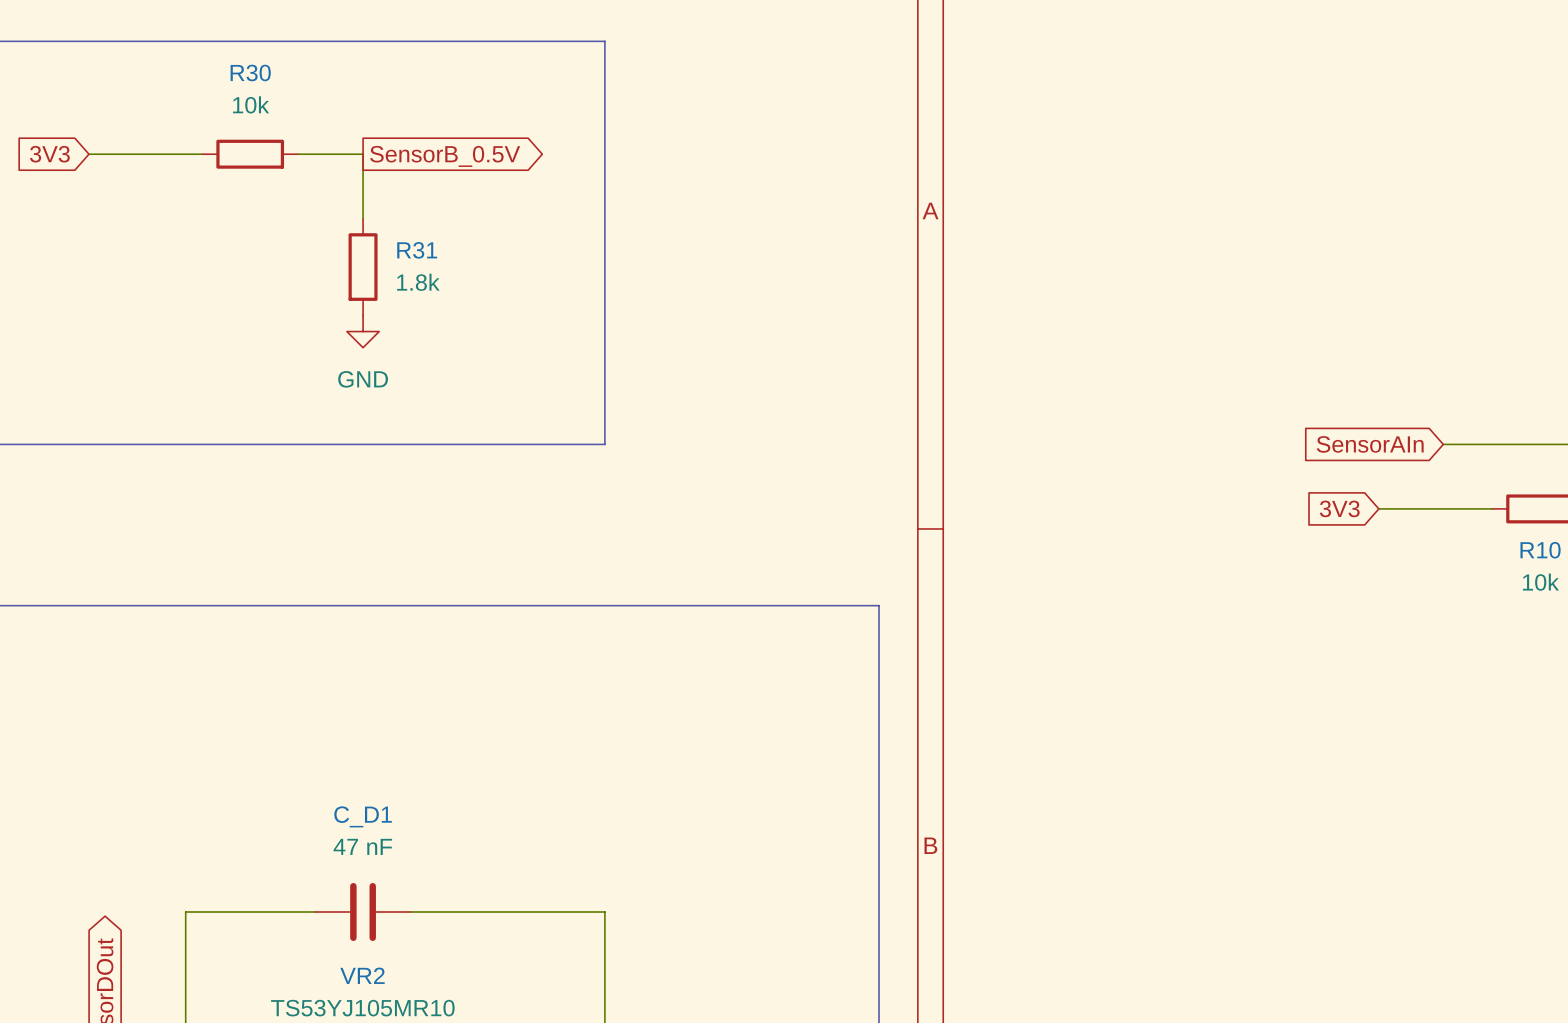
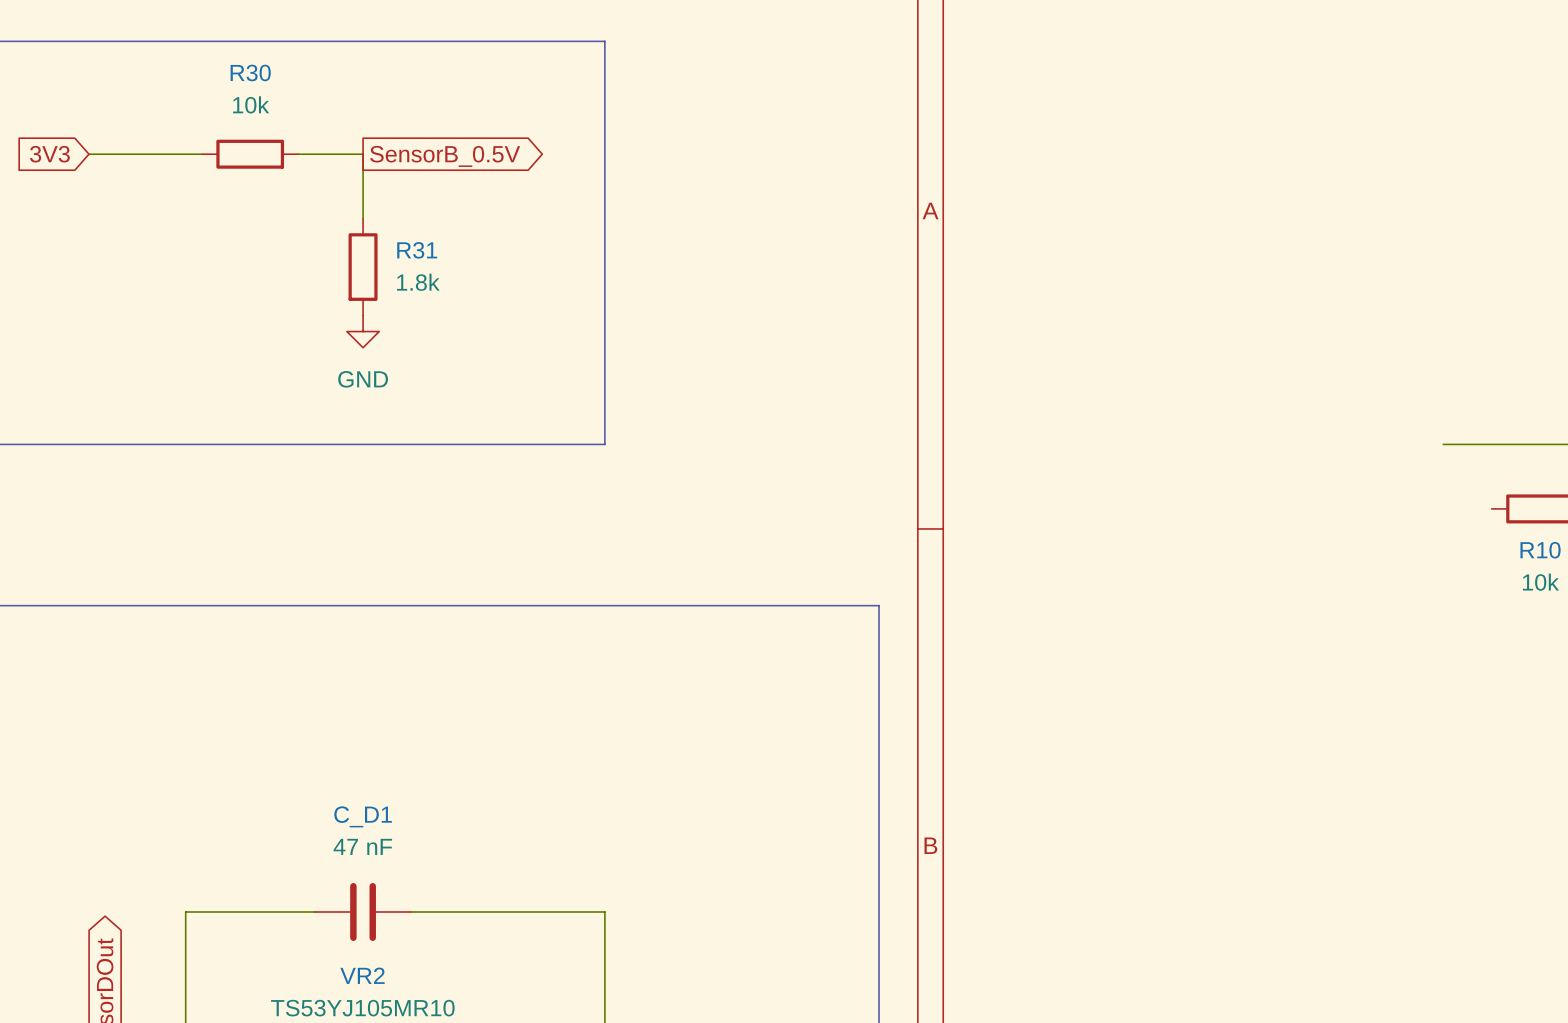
global label: SensorAIn (1370, 444) -> none
global label: 3V3 (1339, 508) -> none
wire: (1378, 508) (1491, 508) -> none

